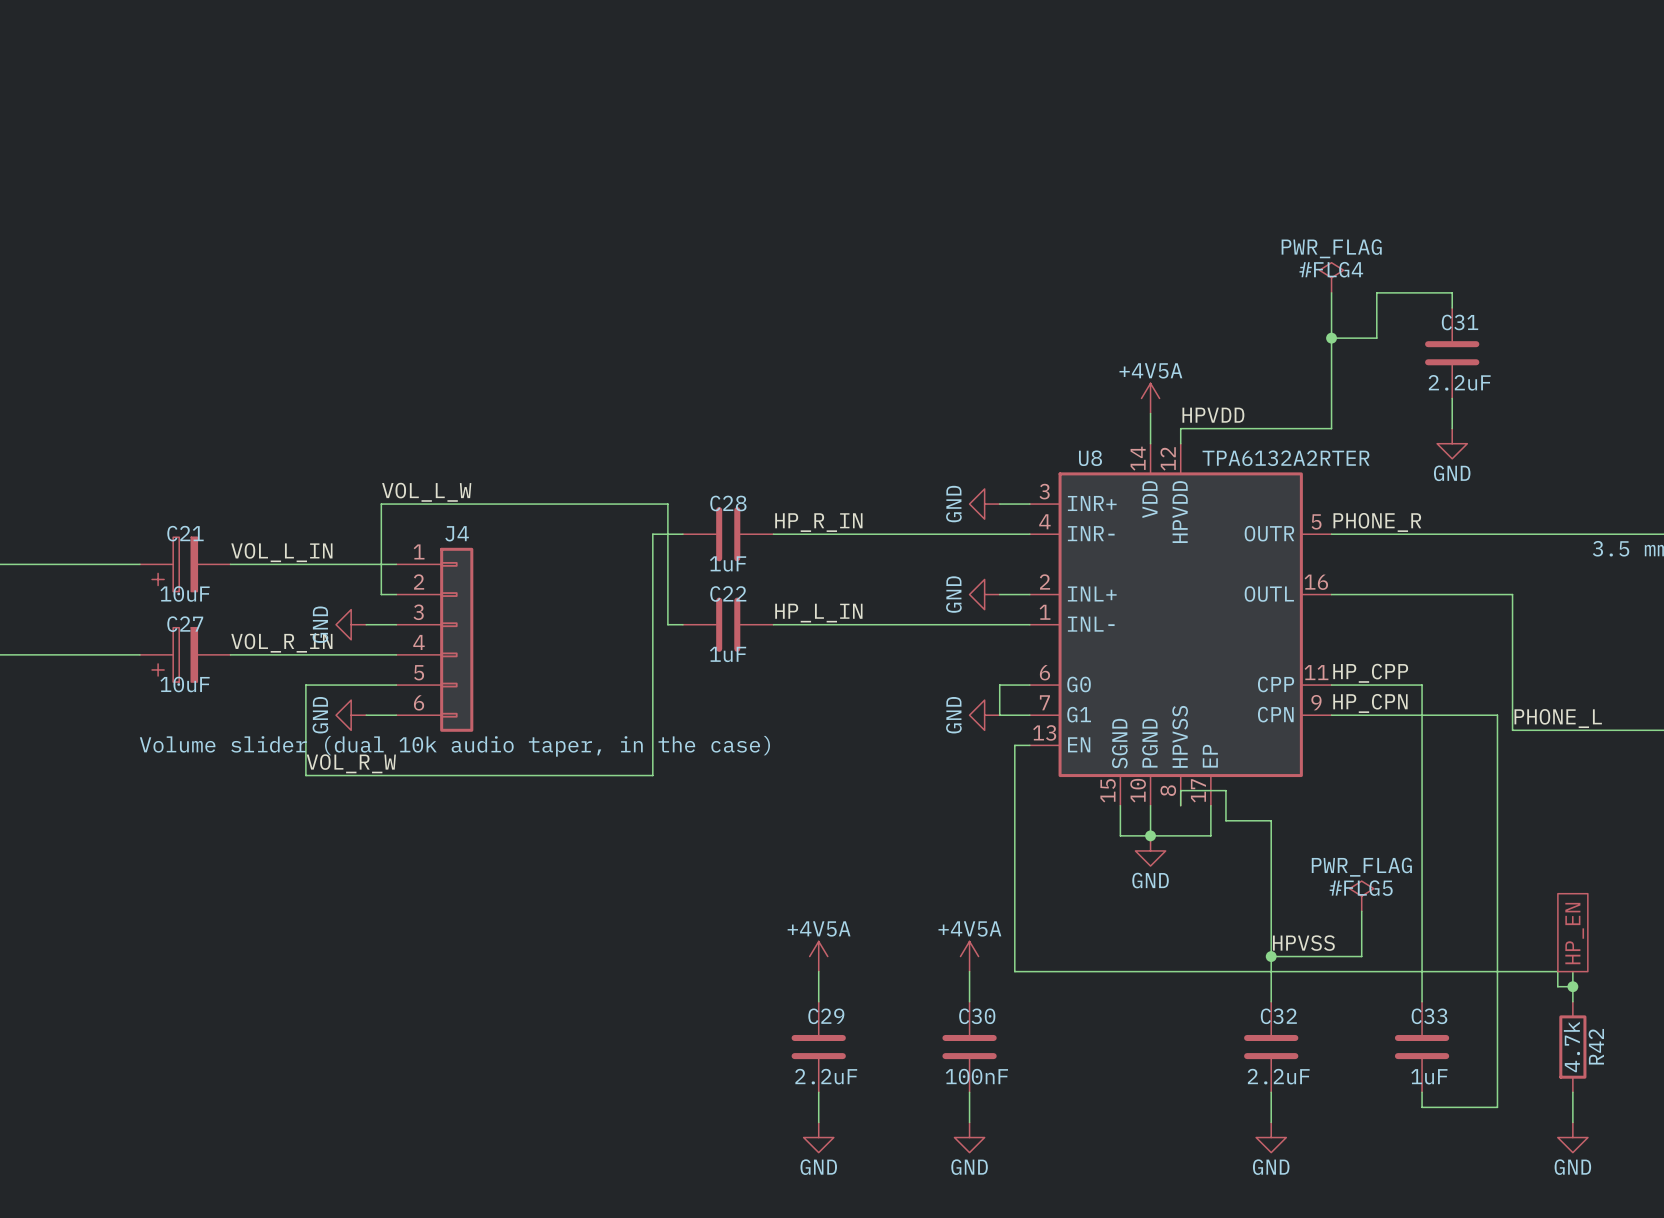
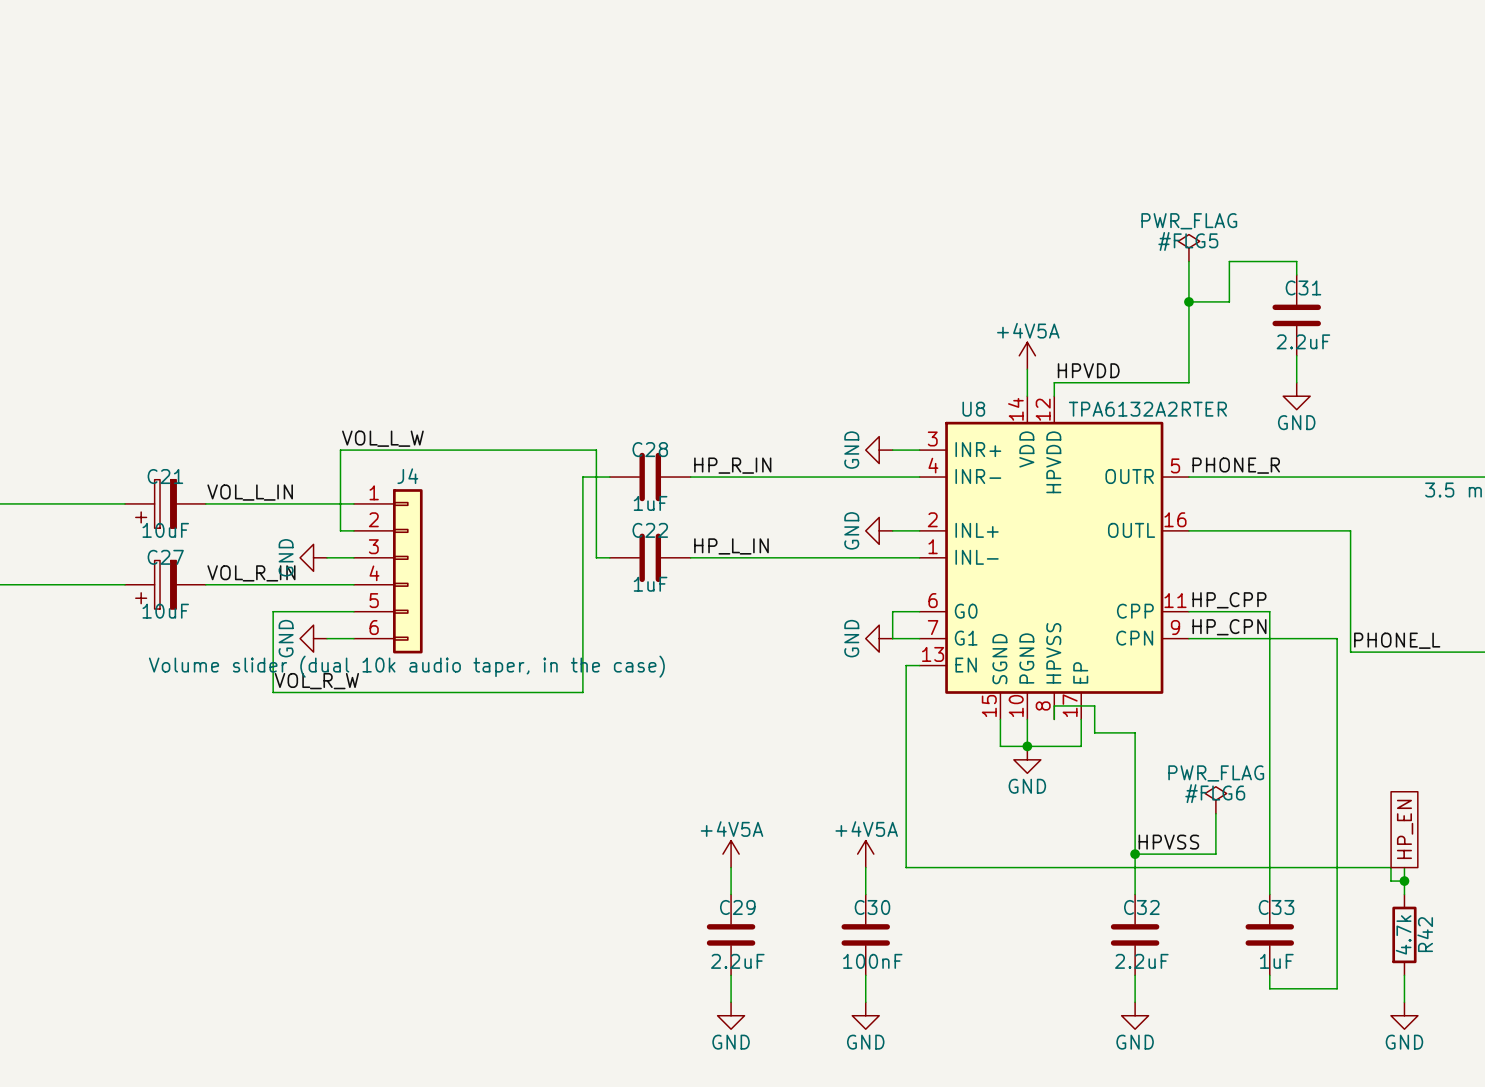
#FLG4 name: #FLG4 (1331, 269) -> #FLG5 (1188, 241)
#FLG5 name: #FLG5 (1361, 888) -> #FLG6 (1215, 793)

